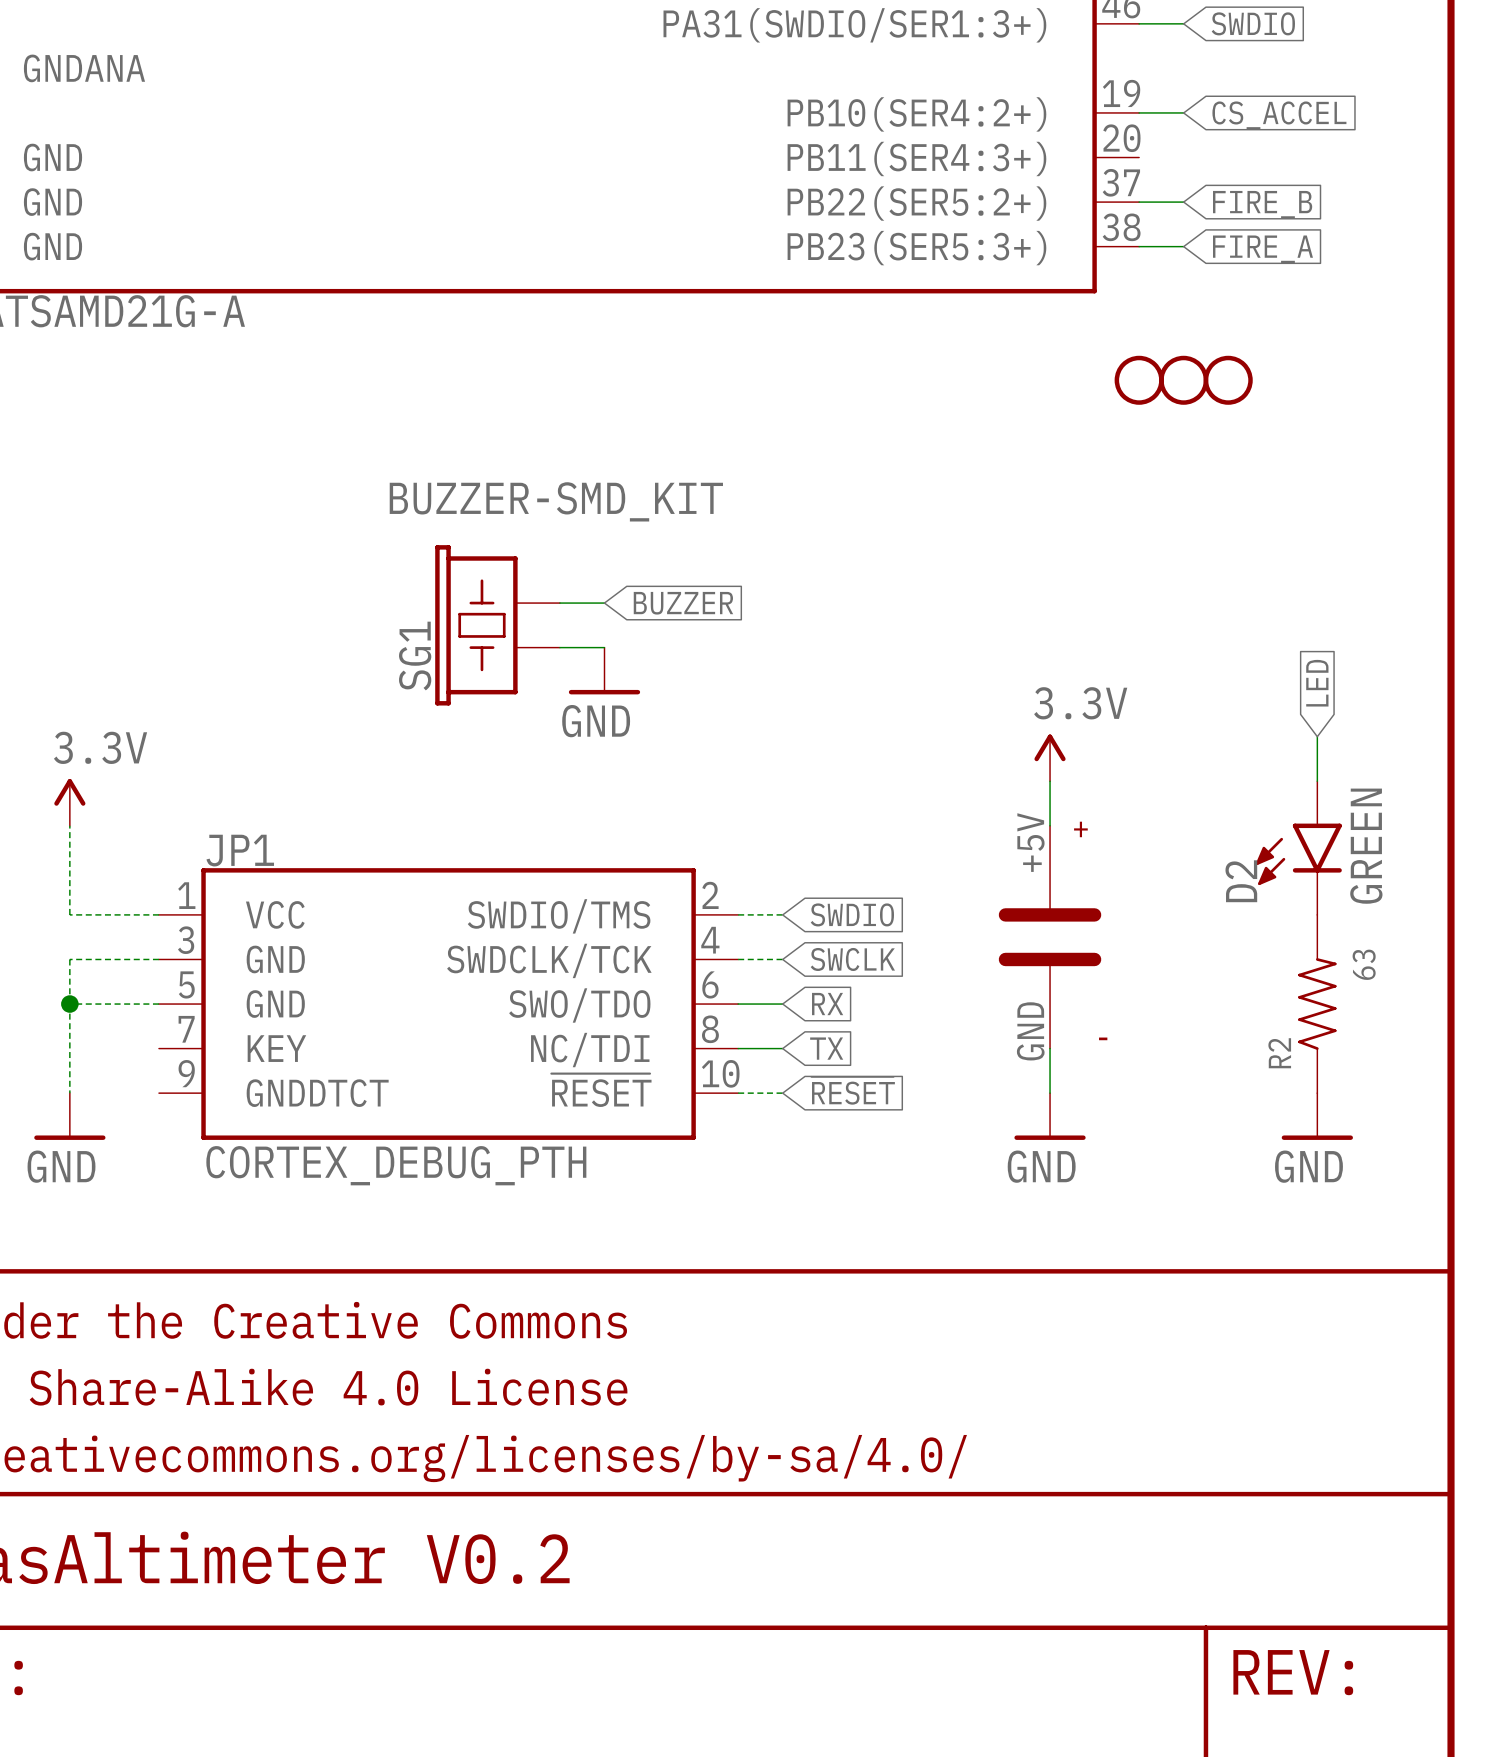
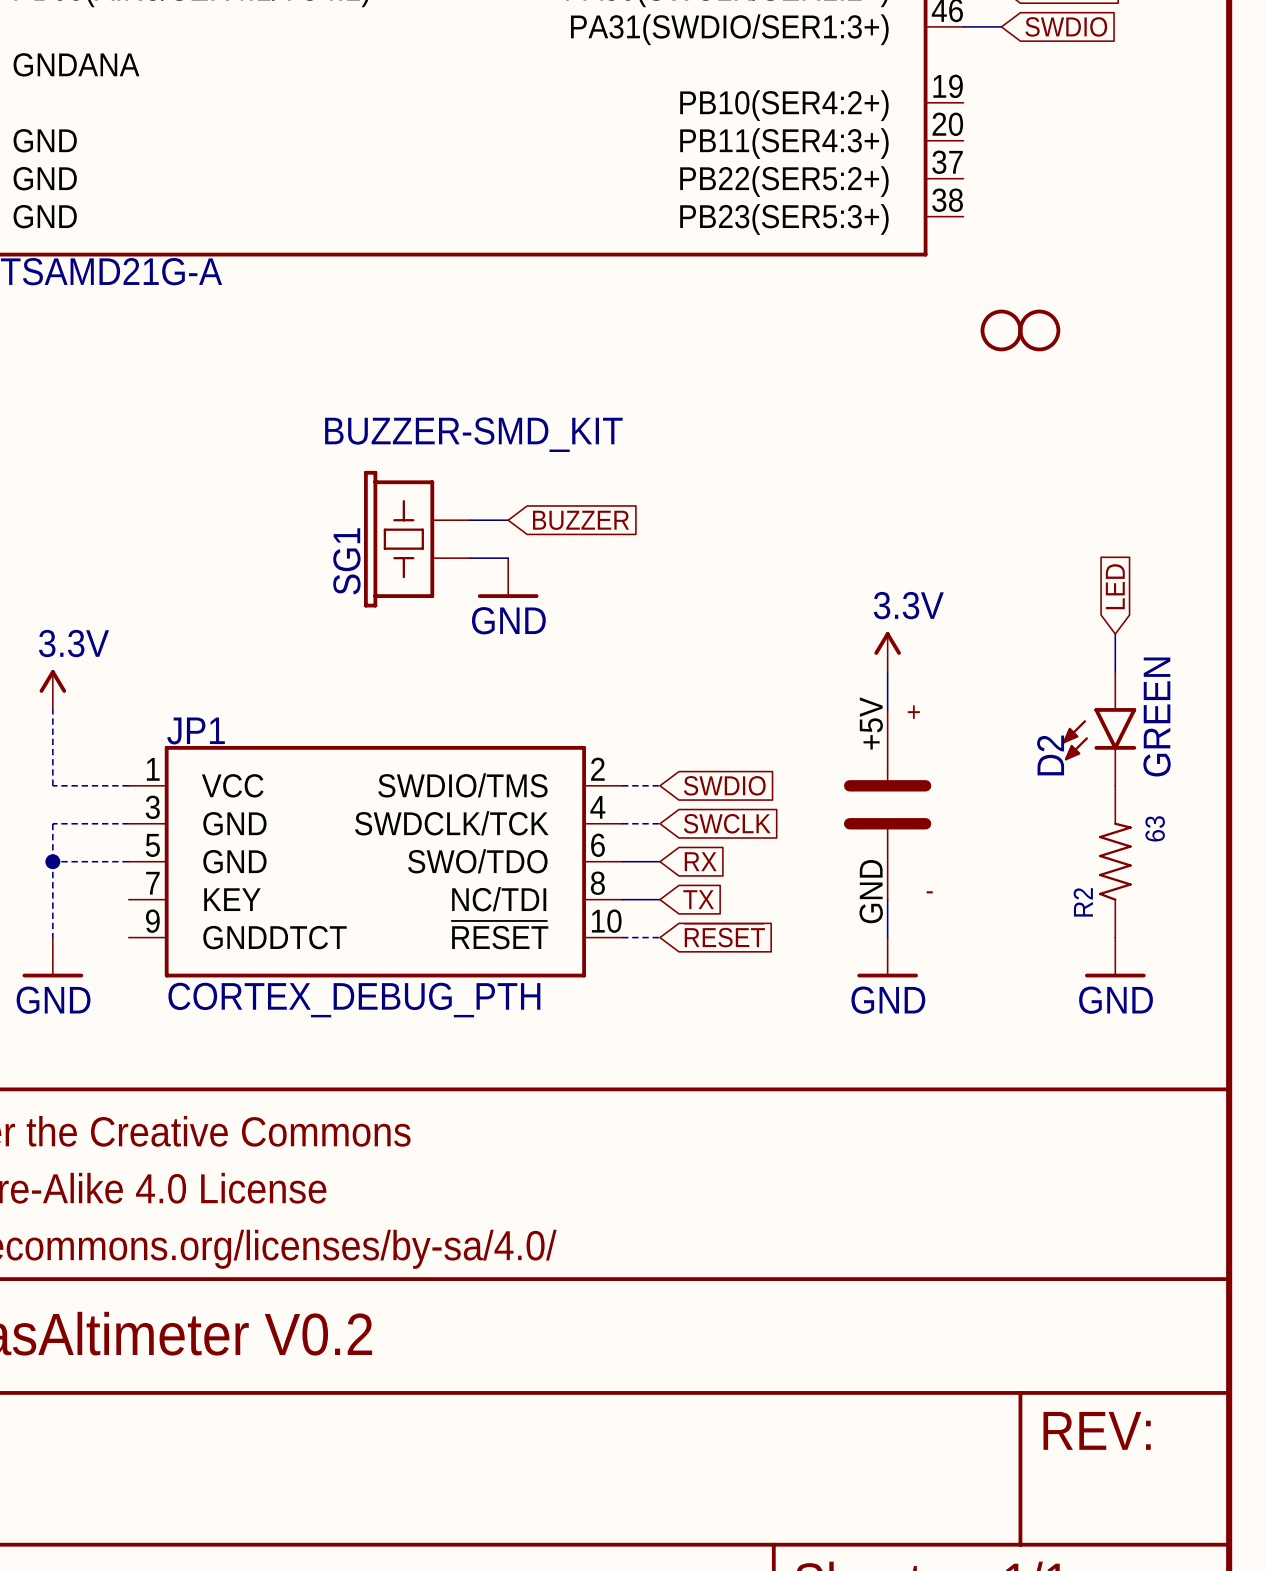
wire: (1139, 112) (1183, 112) -> none
global label: CS_ACCEL (1279, 115) -> none
wire: (1139, 202) (1183, 202) -> none
global label: FIRE_B (1262, 204) -> none
wire: (1139, 246) (1183, 246) -> none
global label: FIRE_A (1262, 249) -> none
part: (1139, 380) -> none

